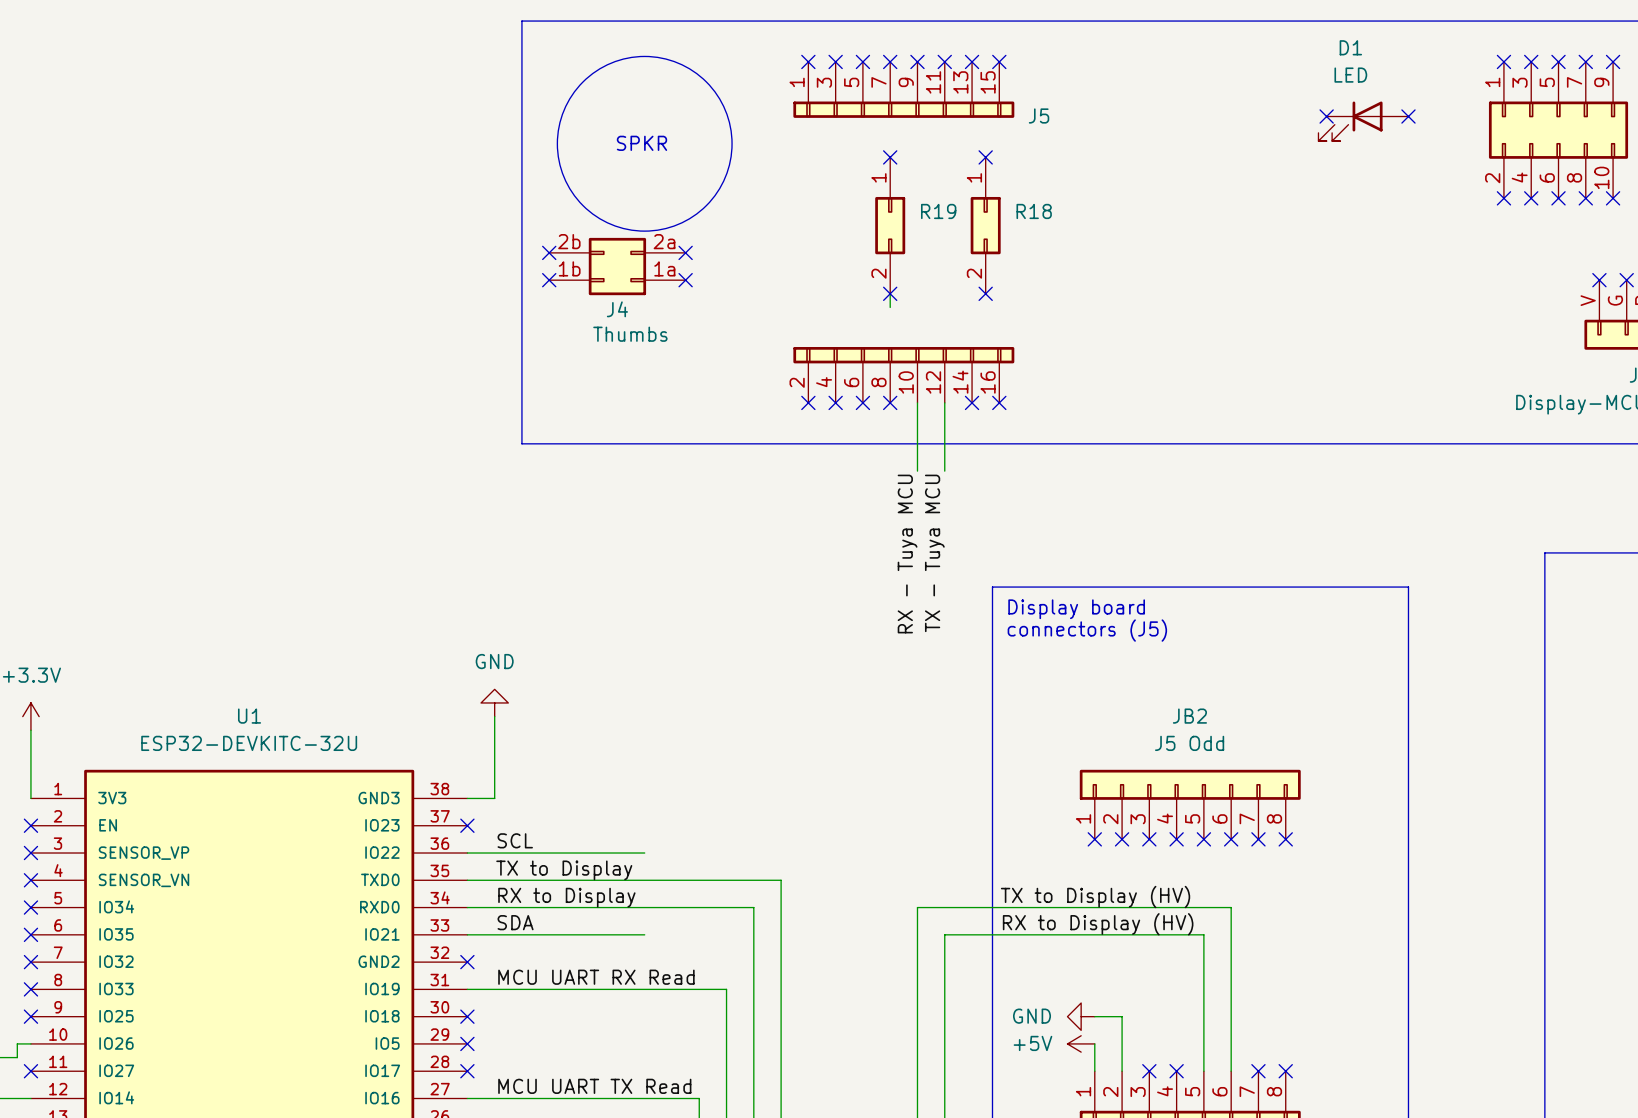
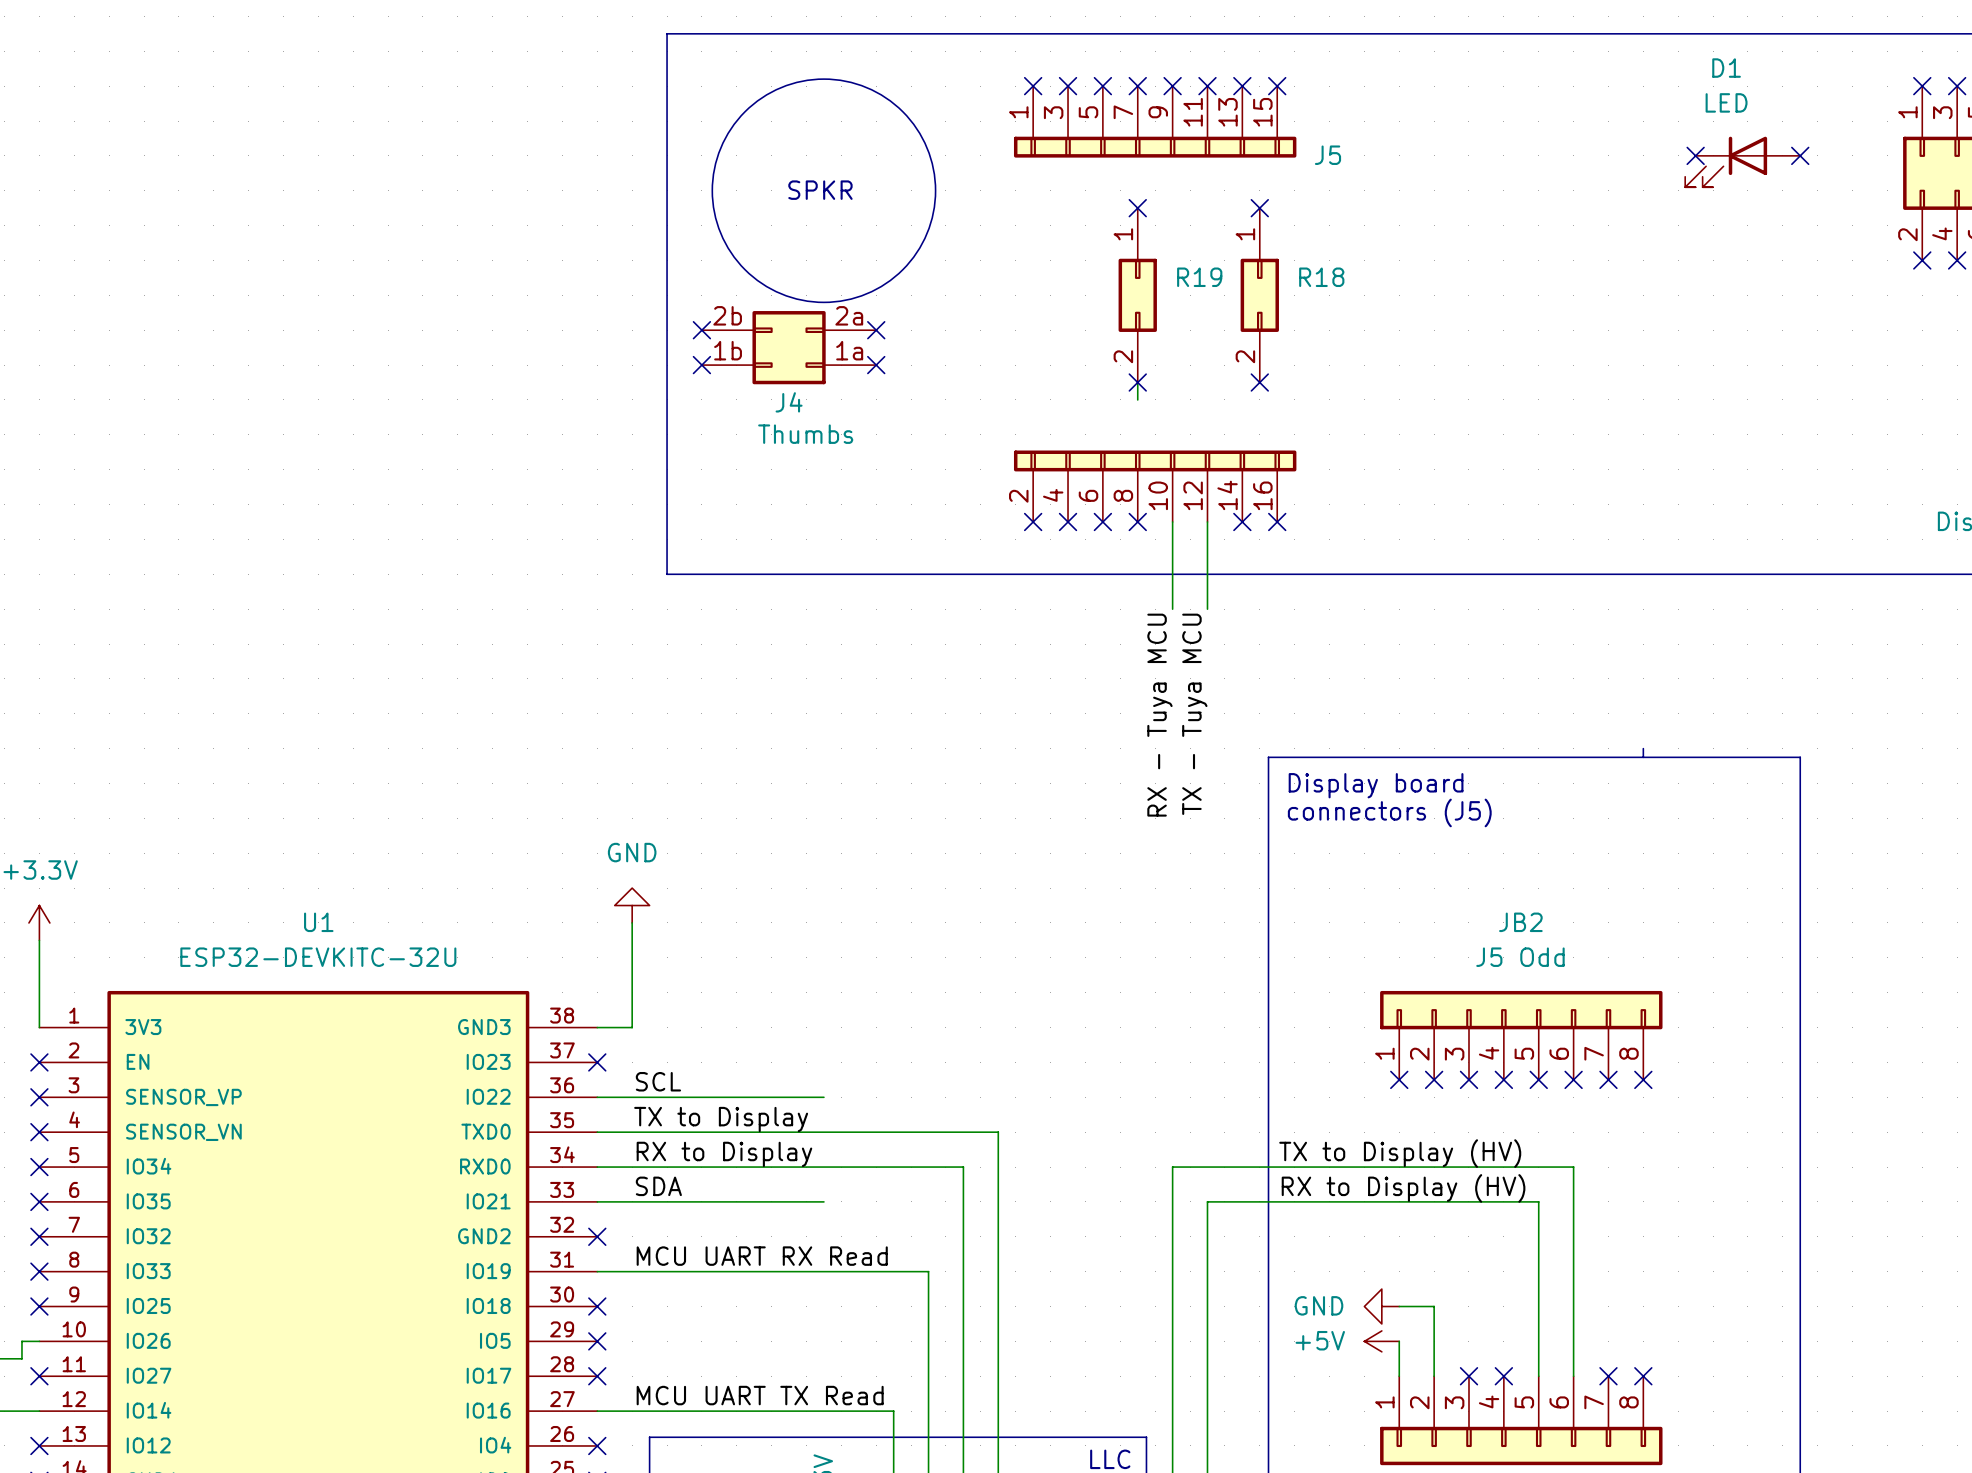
line: none -> (1643, 748) (1643, 757)

